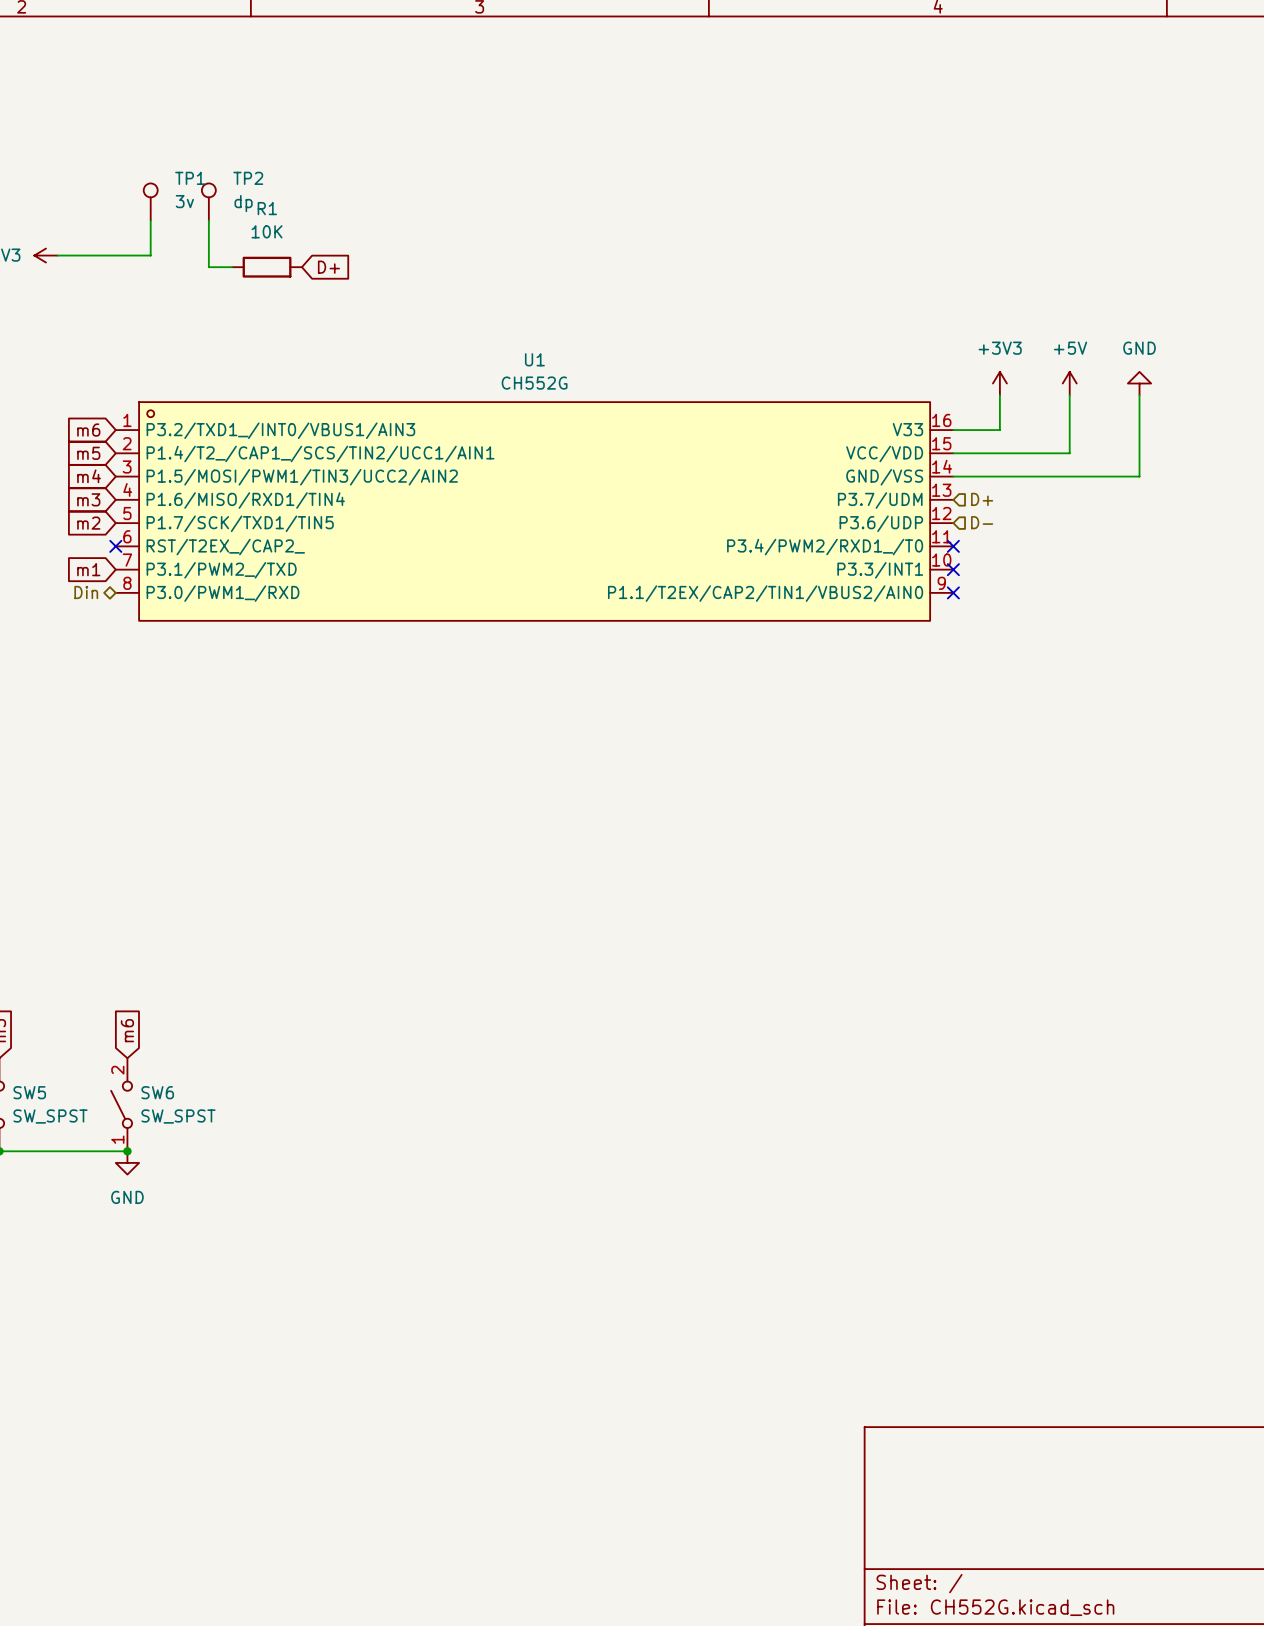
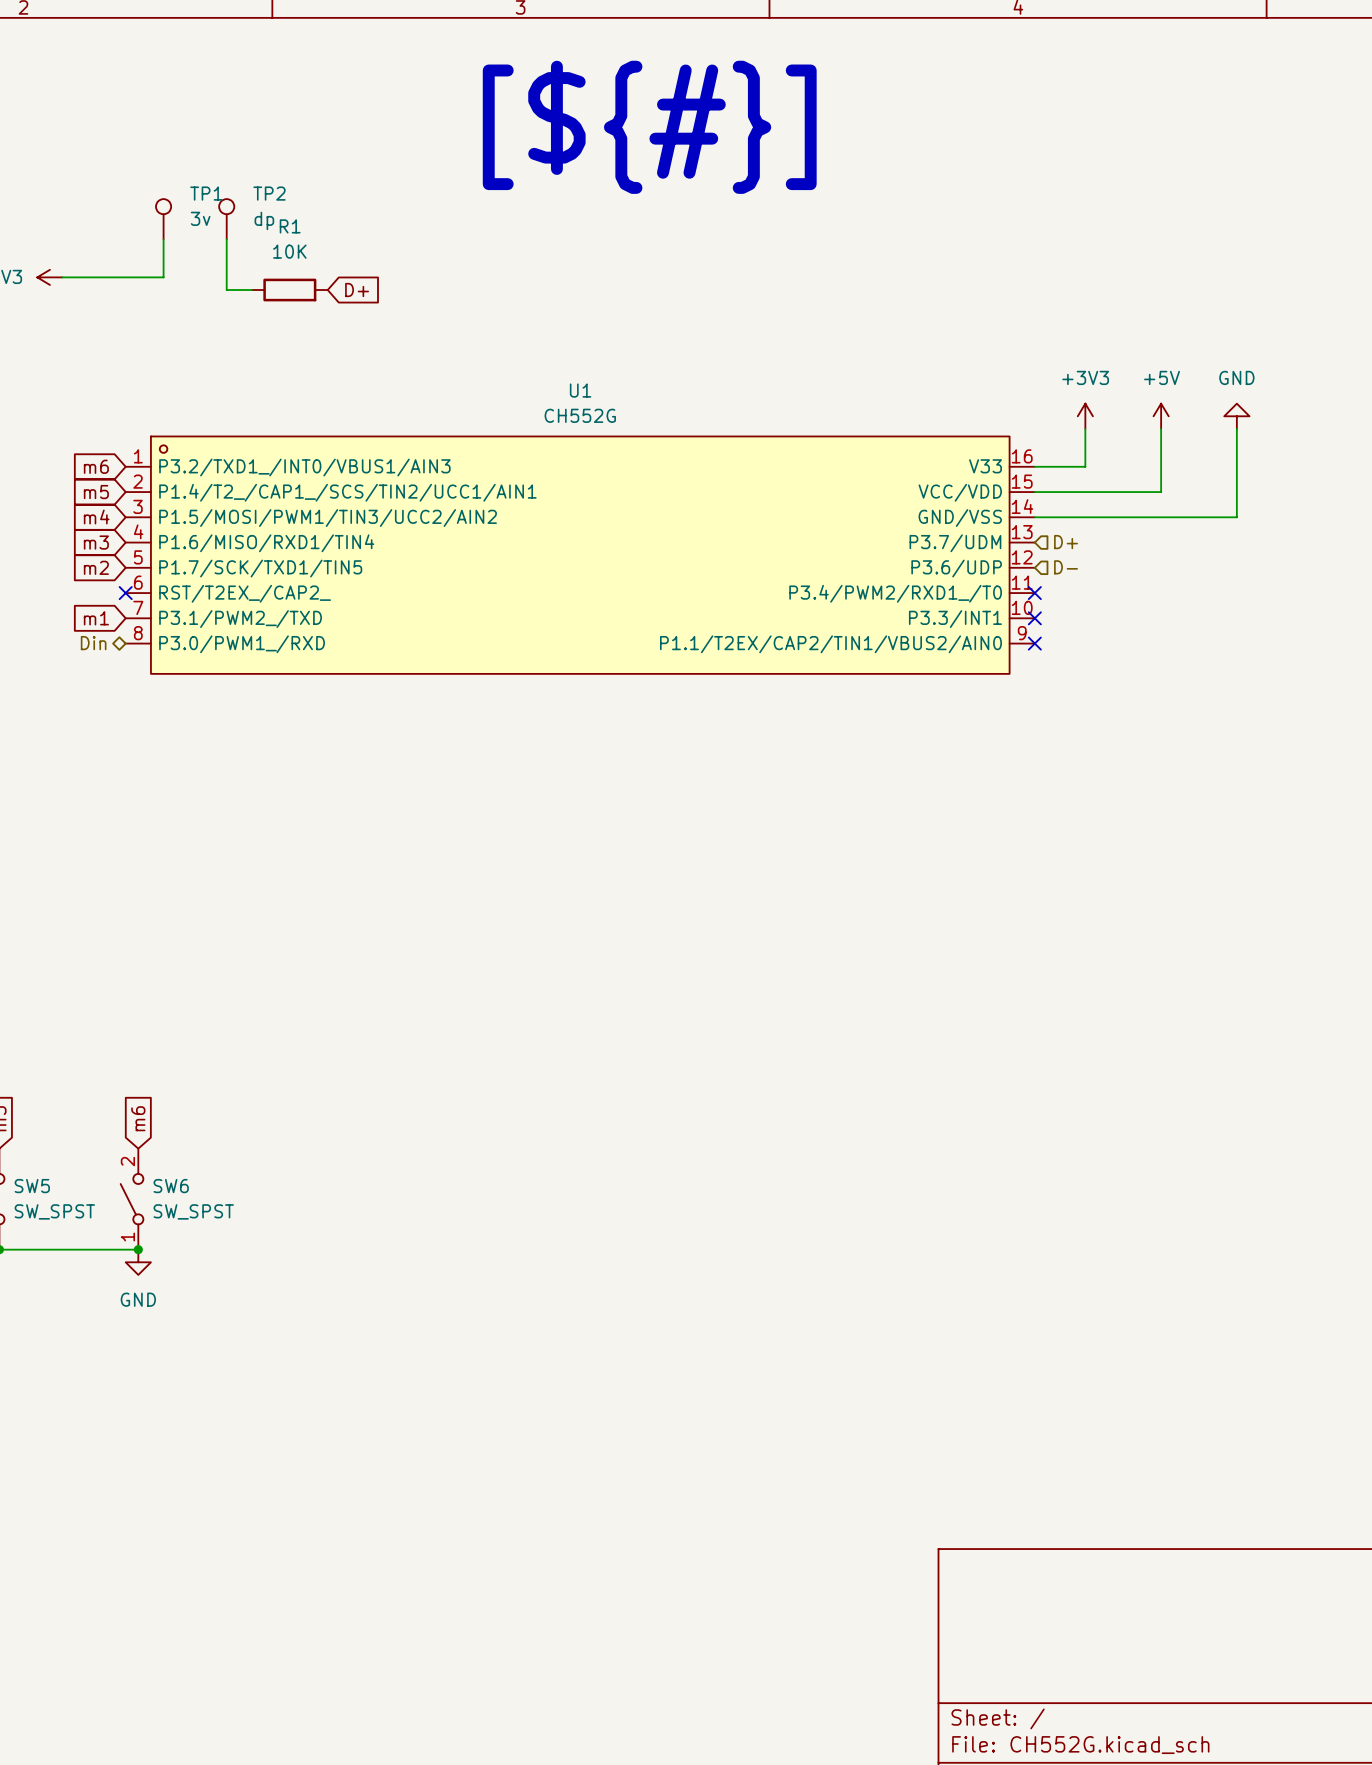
text: none -> [${#}] (649, 127)

